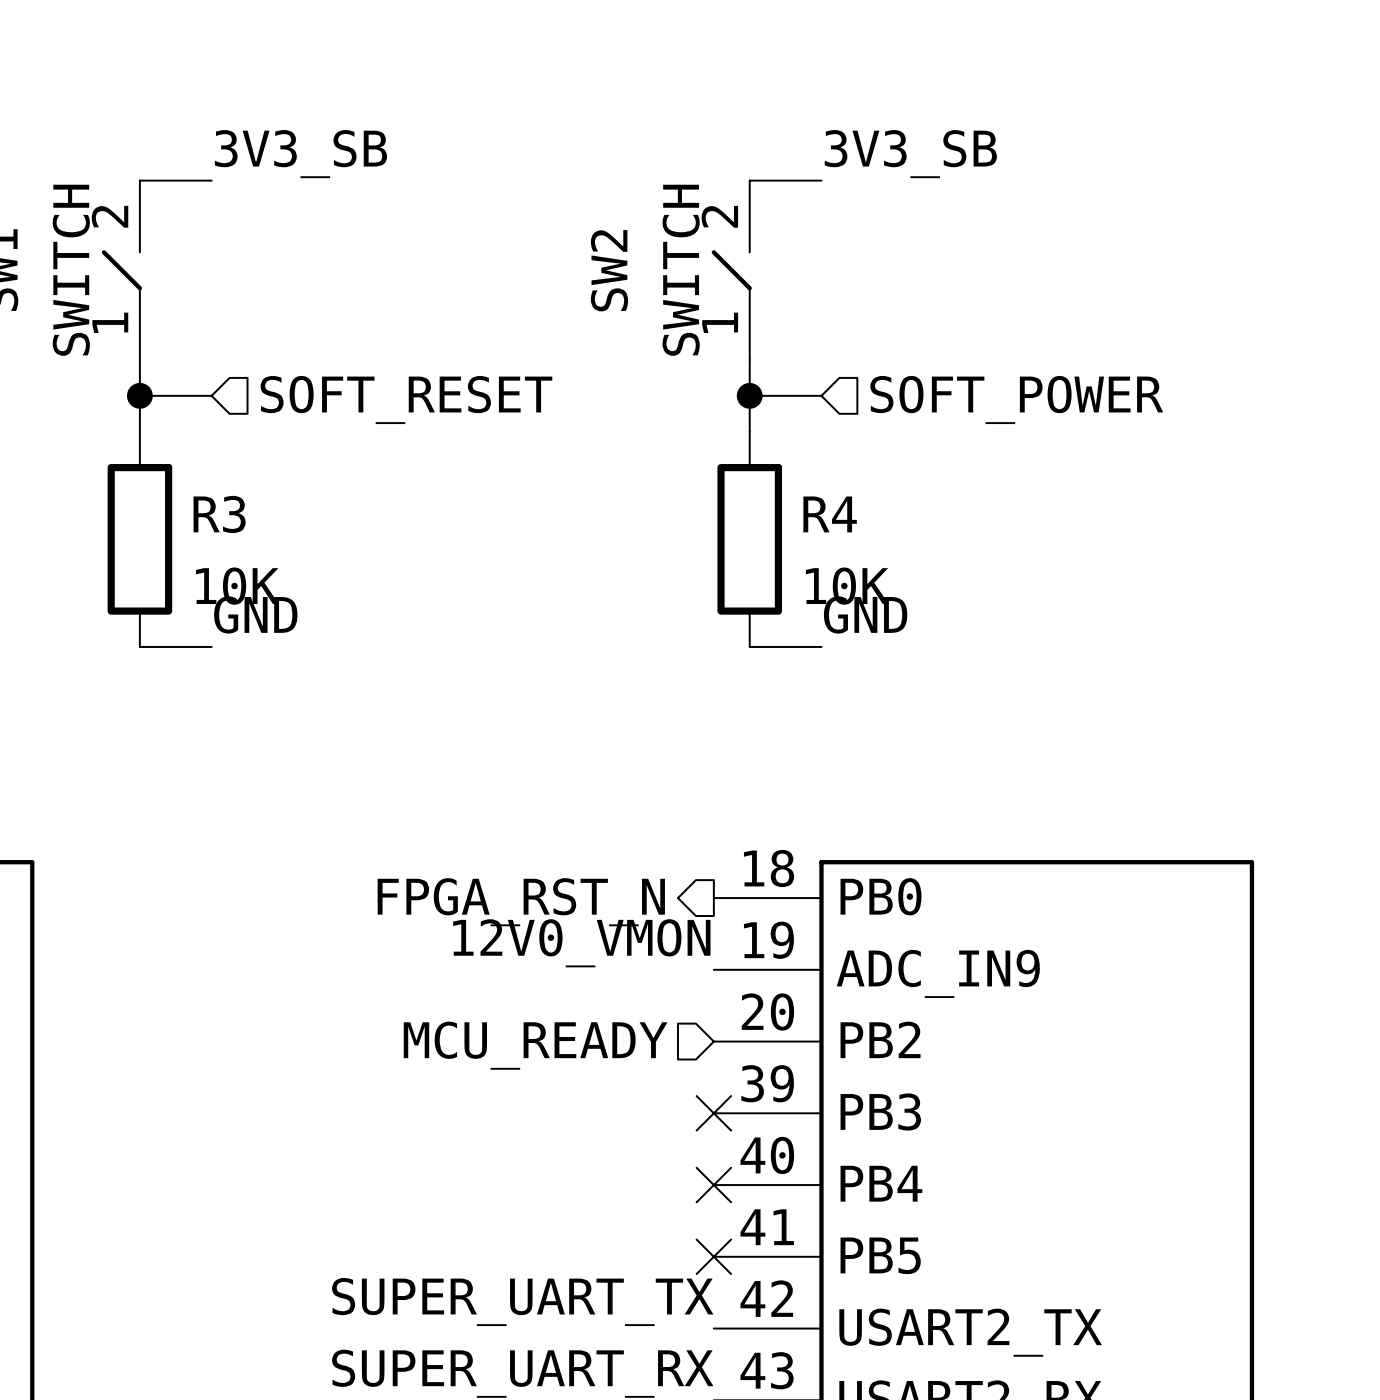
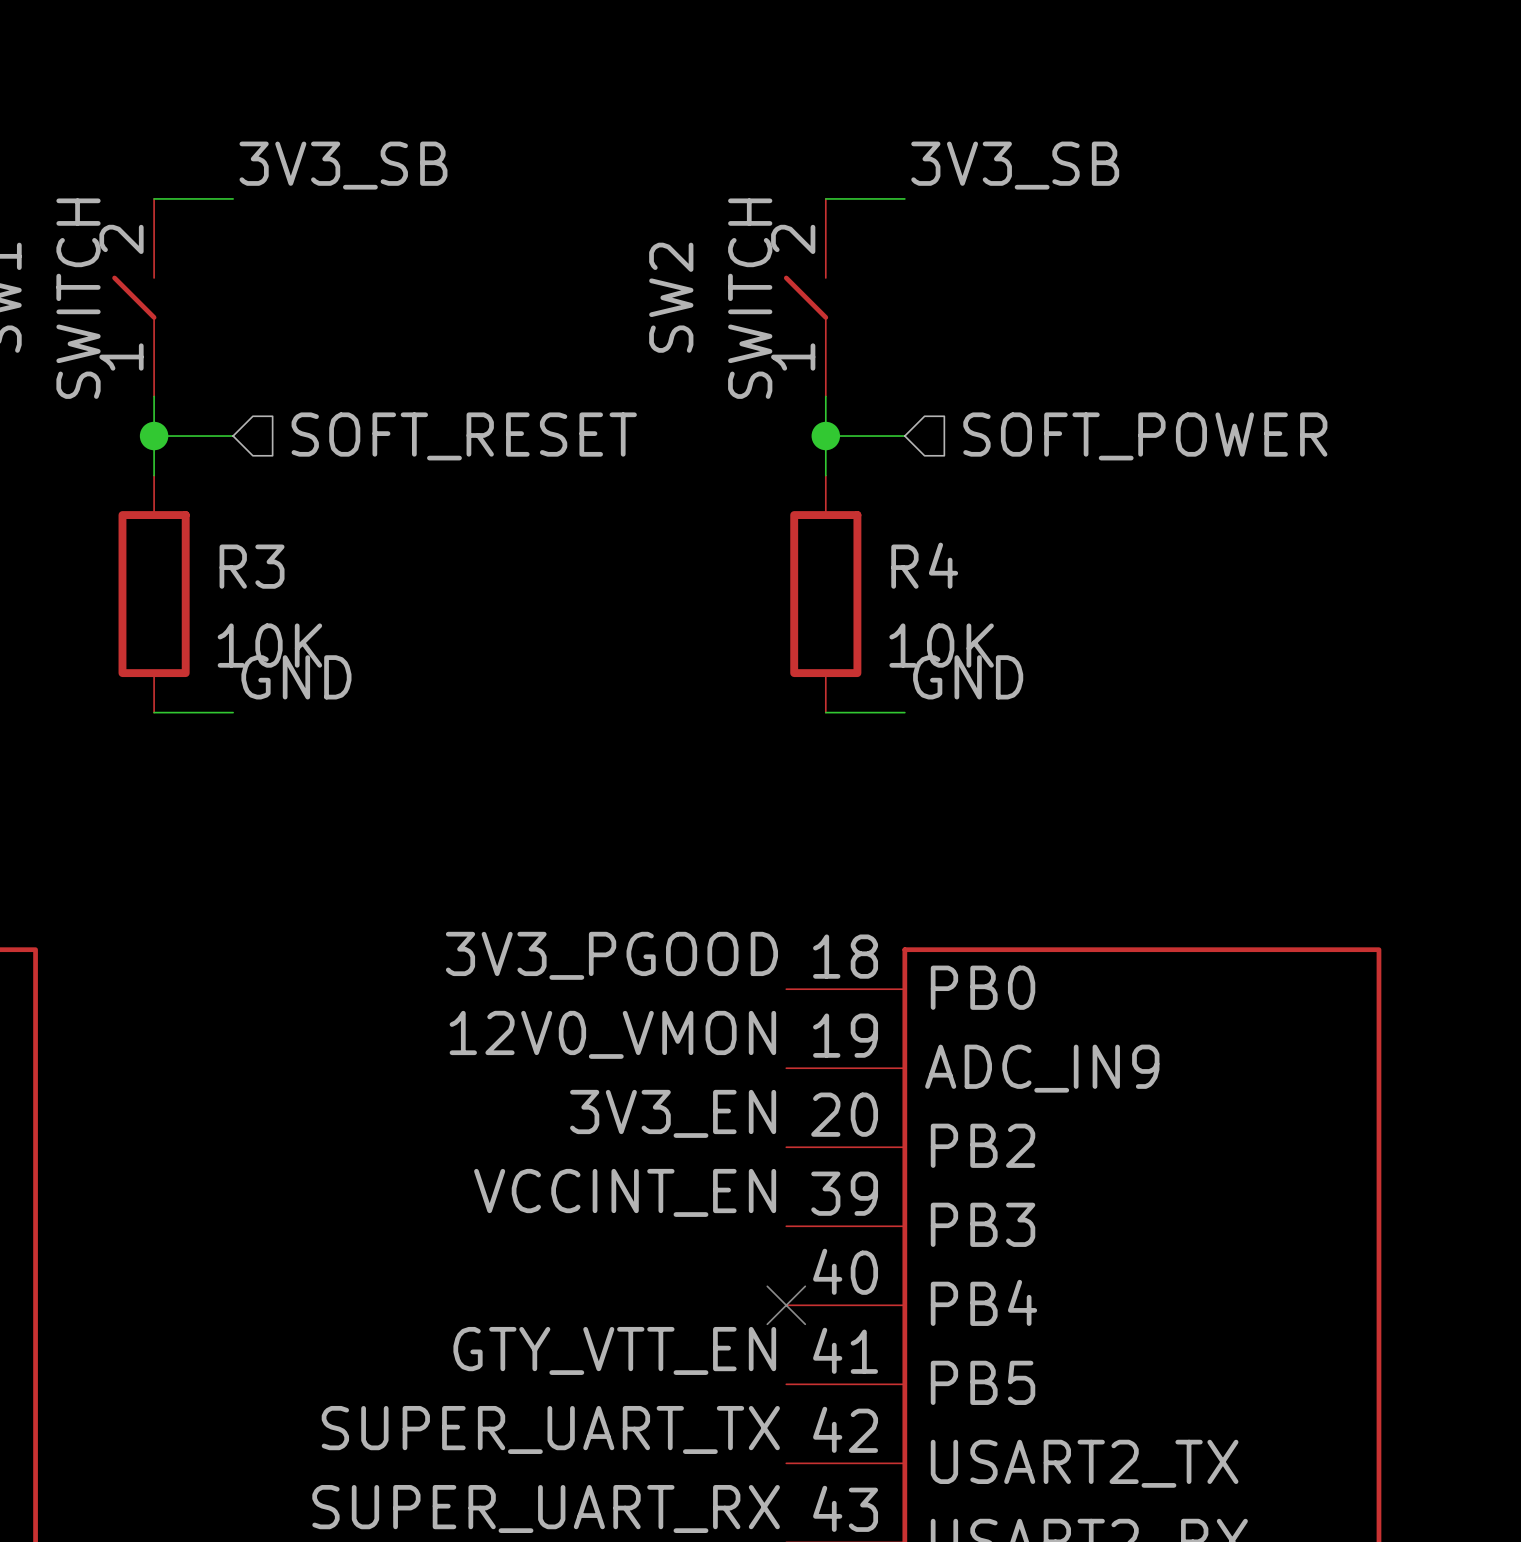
label: none -> 3V3_PGOOD (611, 955)
hierarchical label: FPGA_RST_N (521, 902) -> none
label: none -> 3V3_EN (673, 1113)
hierarchical label: MCU_READY (535, 1045) -> none
label: none -> VCCINT_EN (625, 1192)
no-connect mark: (713, 1113) -> none
label: none -> GTY_VTT_EN (614, 1350)
no-connect mark: (713, 1256) -> none

